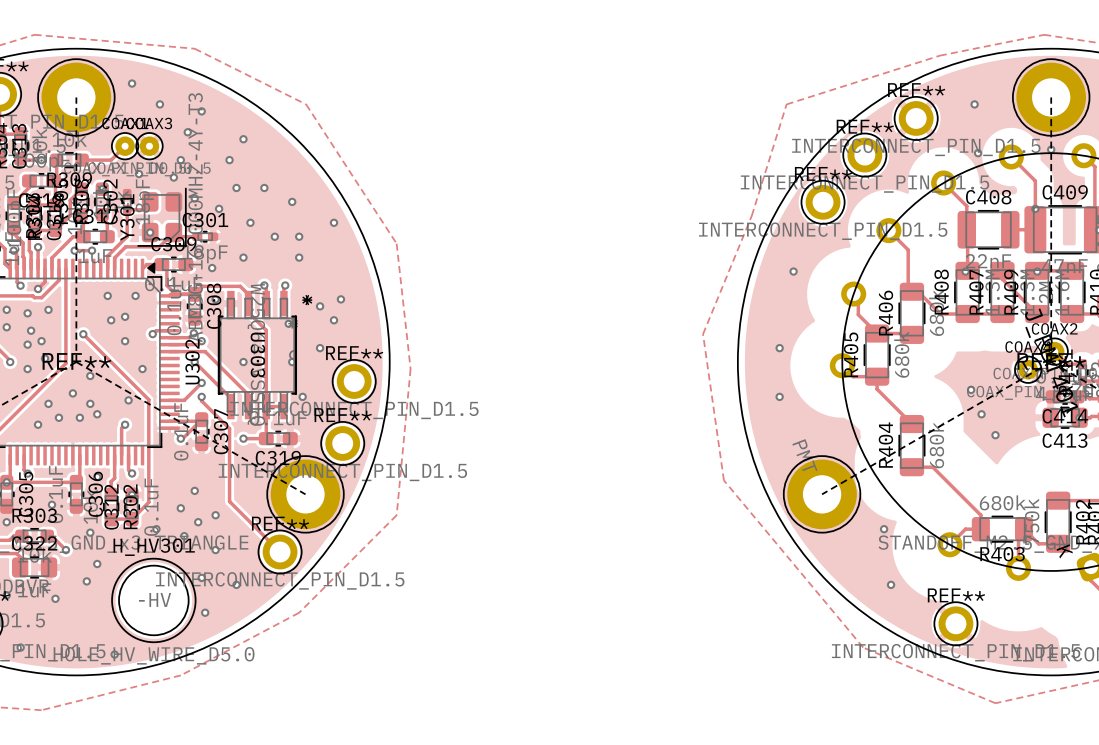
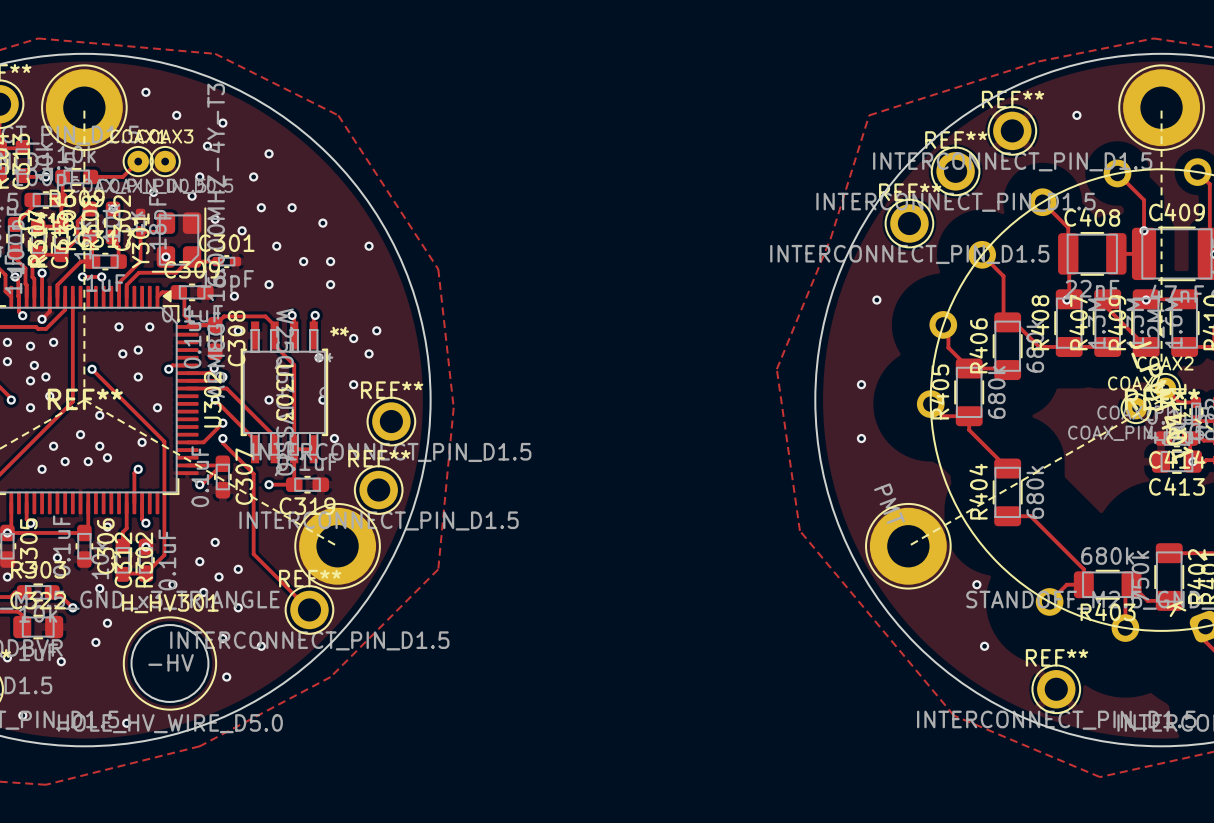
via: (1051, 149) -> none
via: (978, 153) -> none
via: (971, 389) -> none
via: (981, 414) -> none
via: (995, 435) -> none

